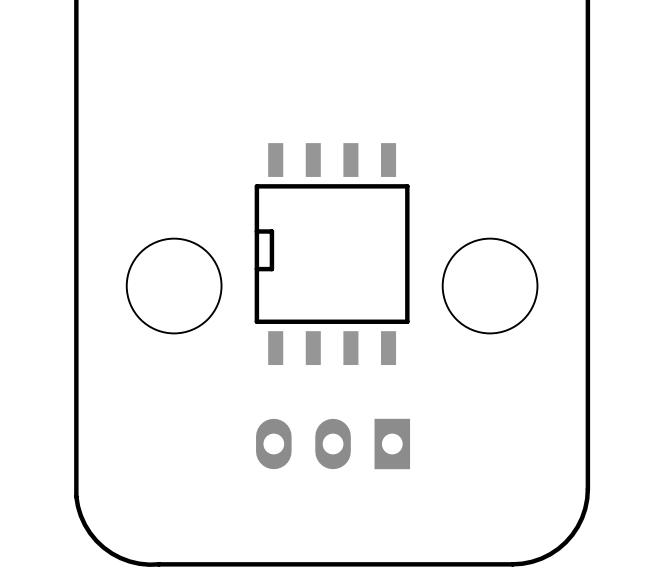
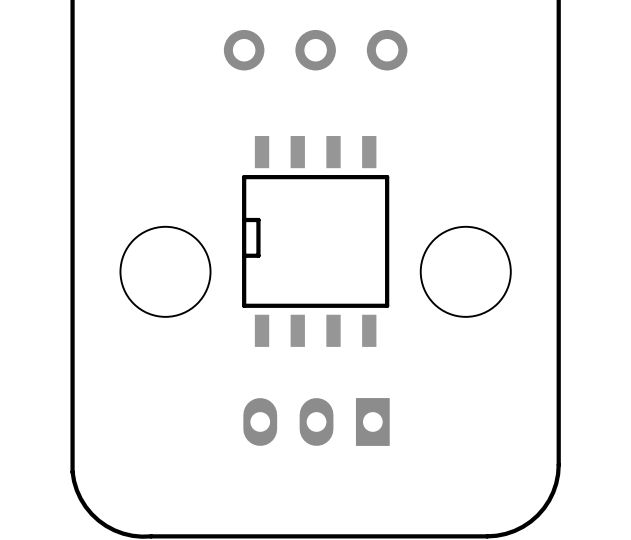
part: none -> (315, 50)

